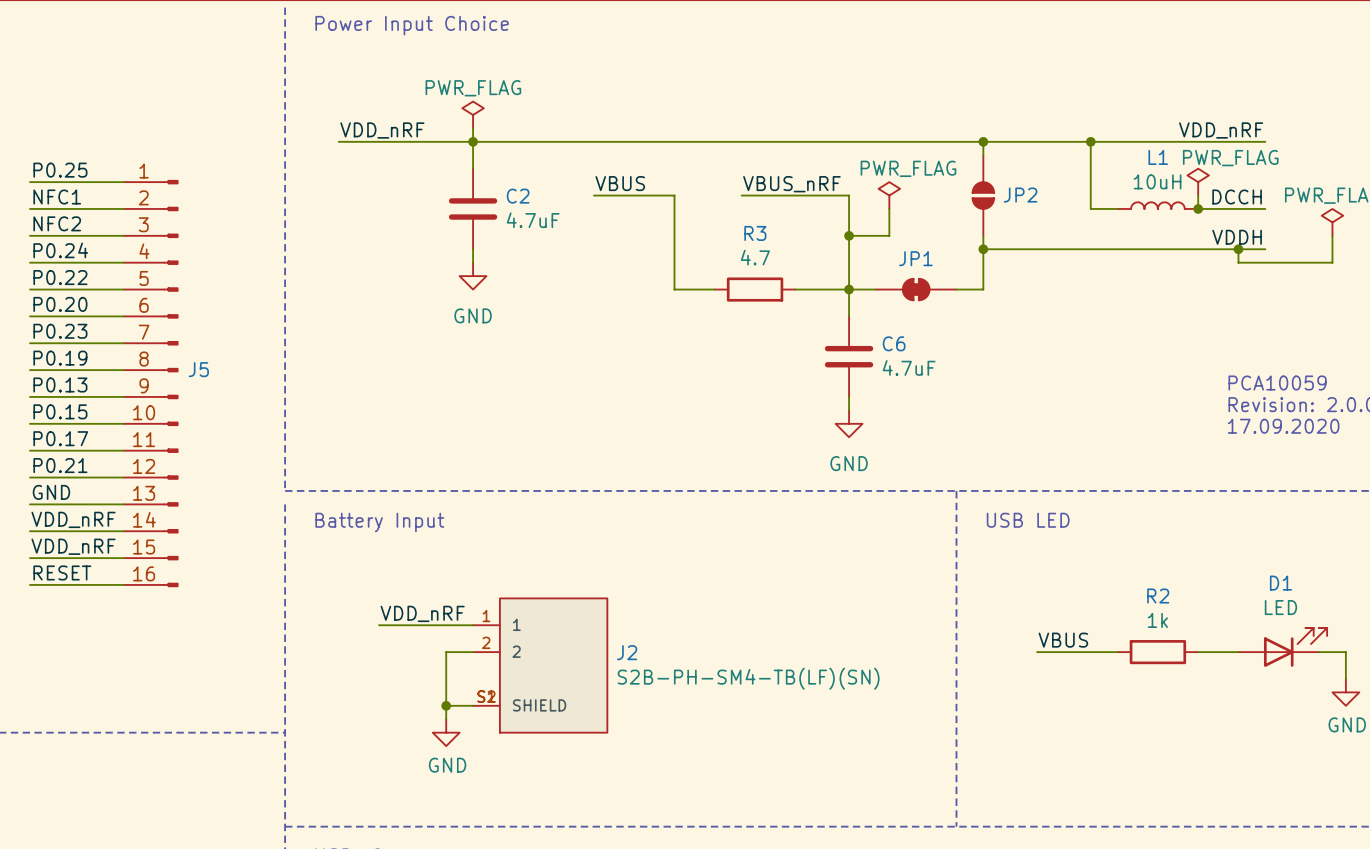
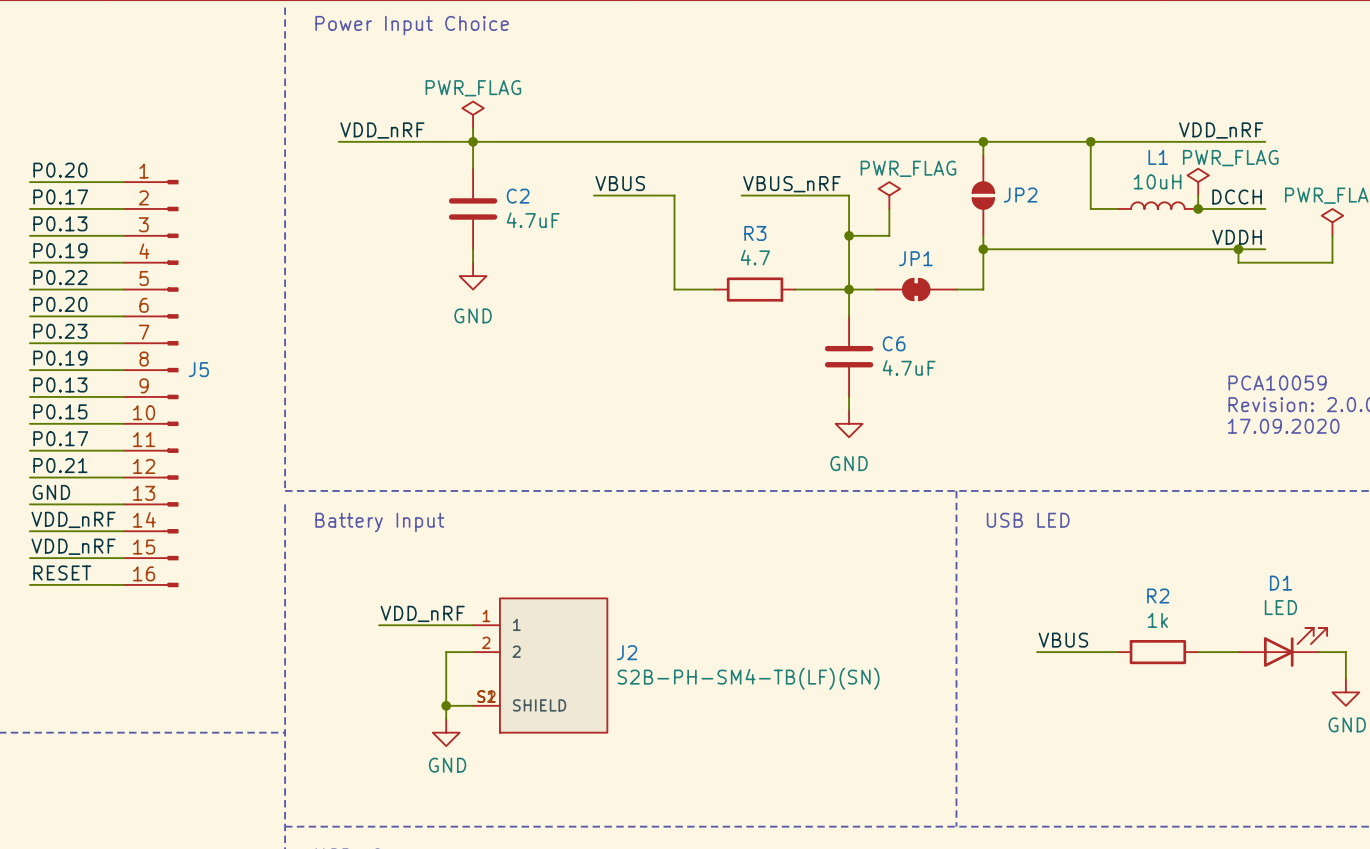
label: P0.25 (60, 170) -> P0.20 (60, 170)
label: NFC1 (57, 196) -> P0.17 (60, 196)
label: NFC2 (57, 223) -> P0.13 (60, 223)
label: P0.24 (60, 250) -> P0.19 (60, 250)

